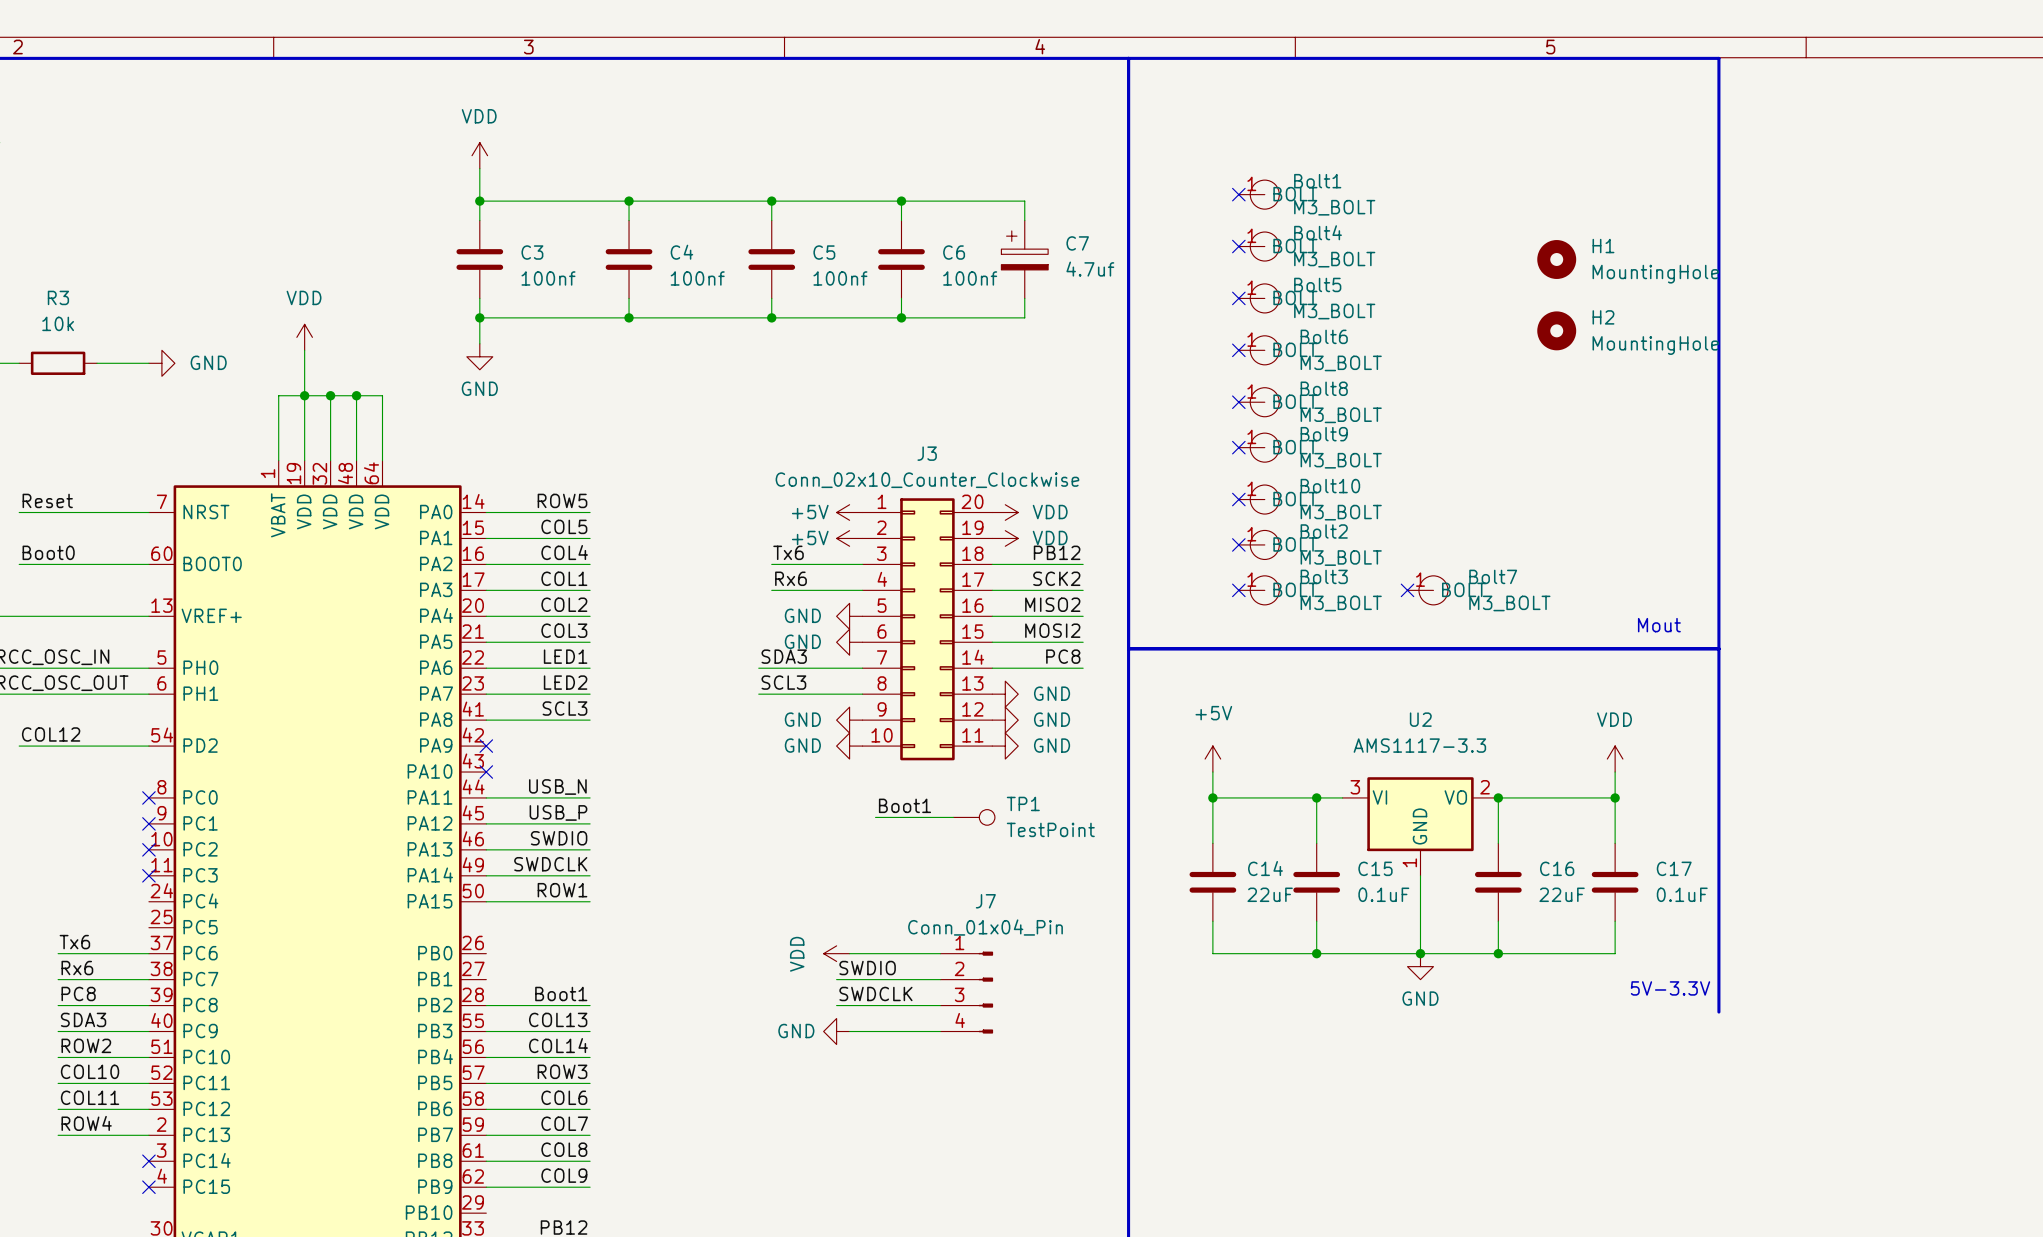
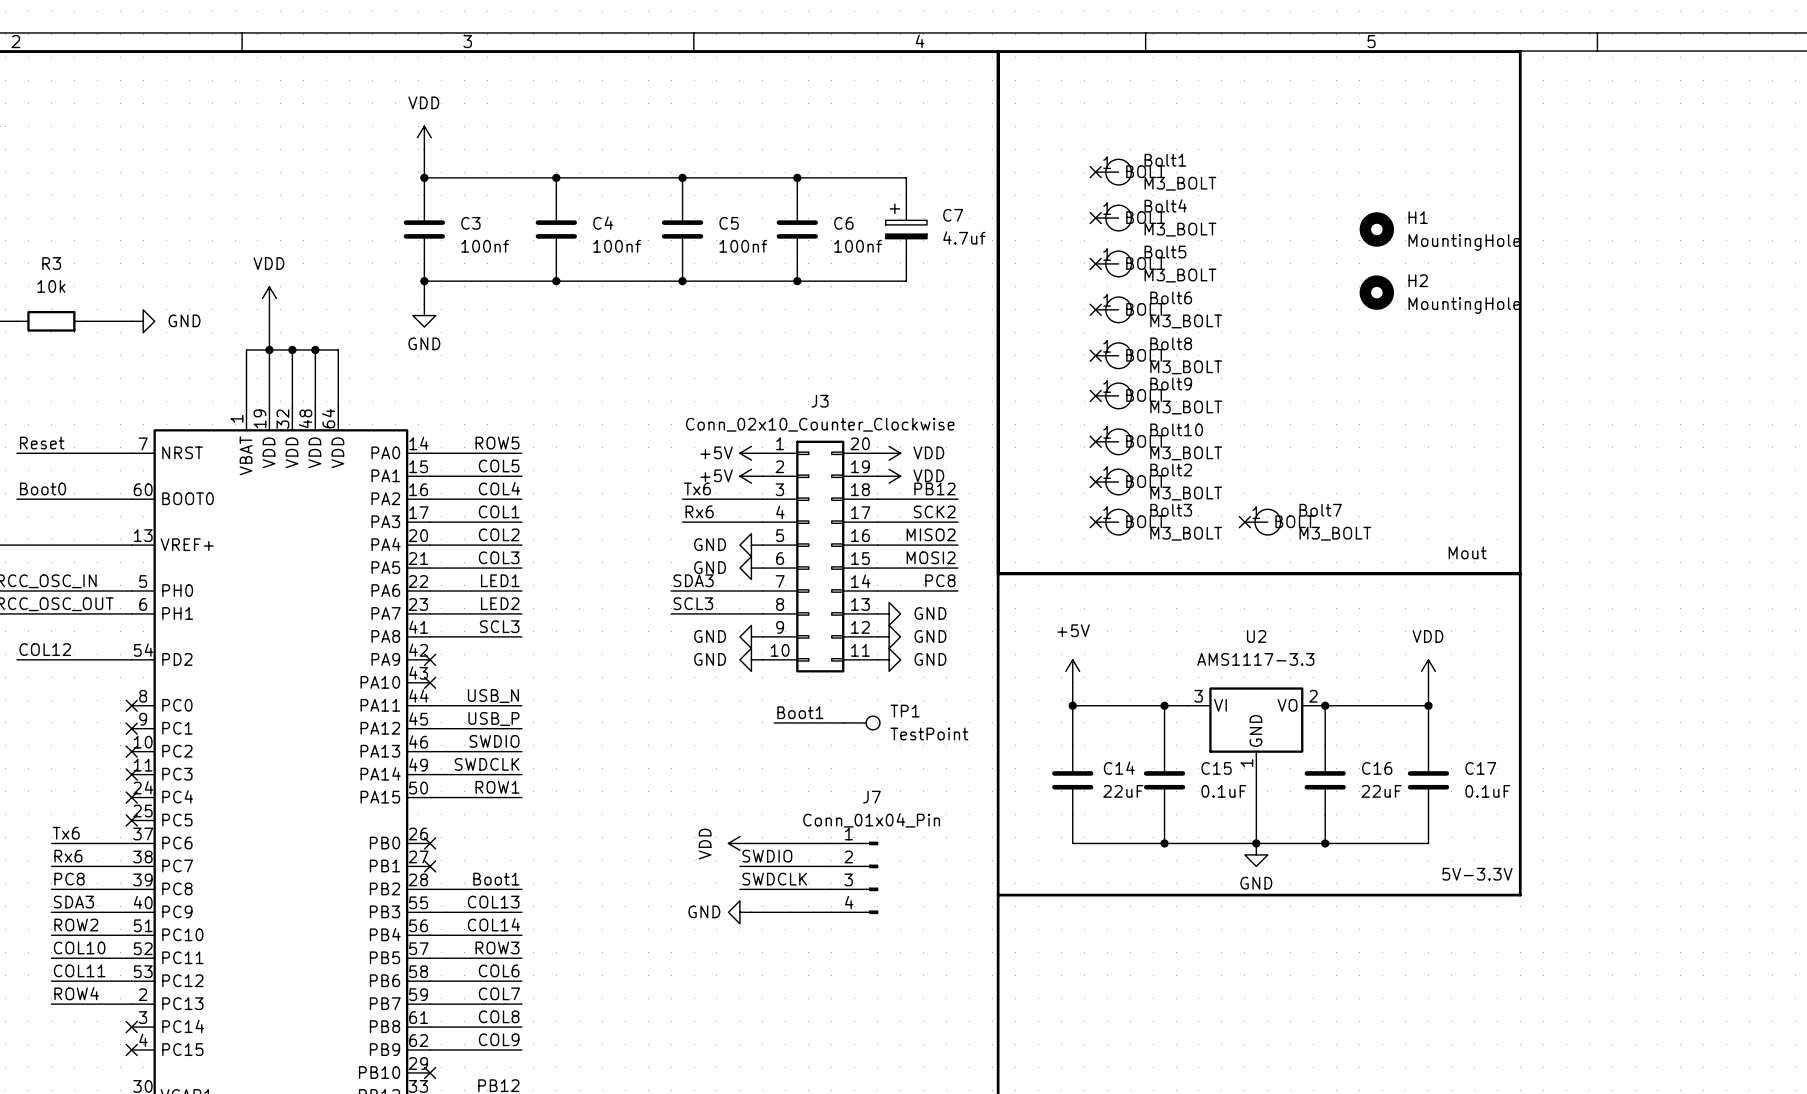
no-connect mark: none -> (131, 797)
no-connect mark: none -> (131, 820)
no-connect mark: none -> (430, 843)
no-connect mark: none -> (430, 866)
line: none -> (998, 895) (1520, 895)
no-connect mark: none -> (430, 1072)

